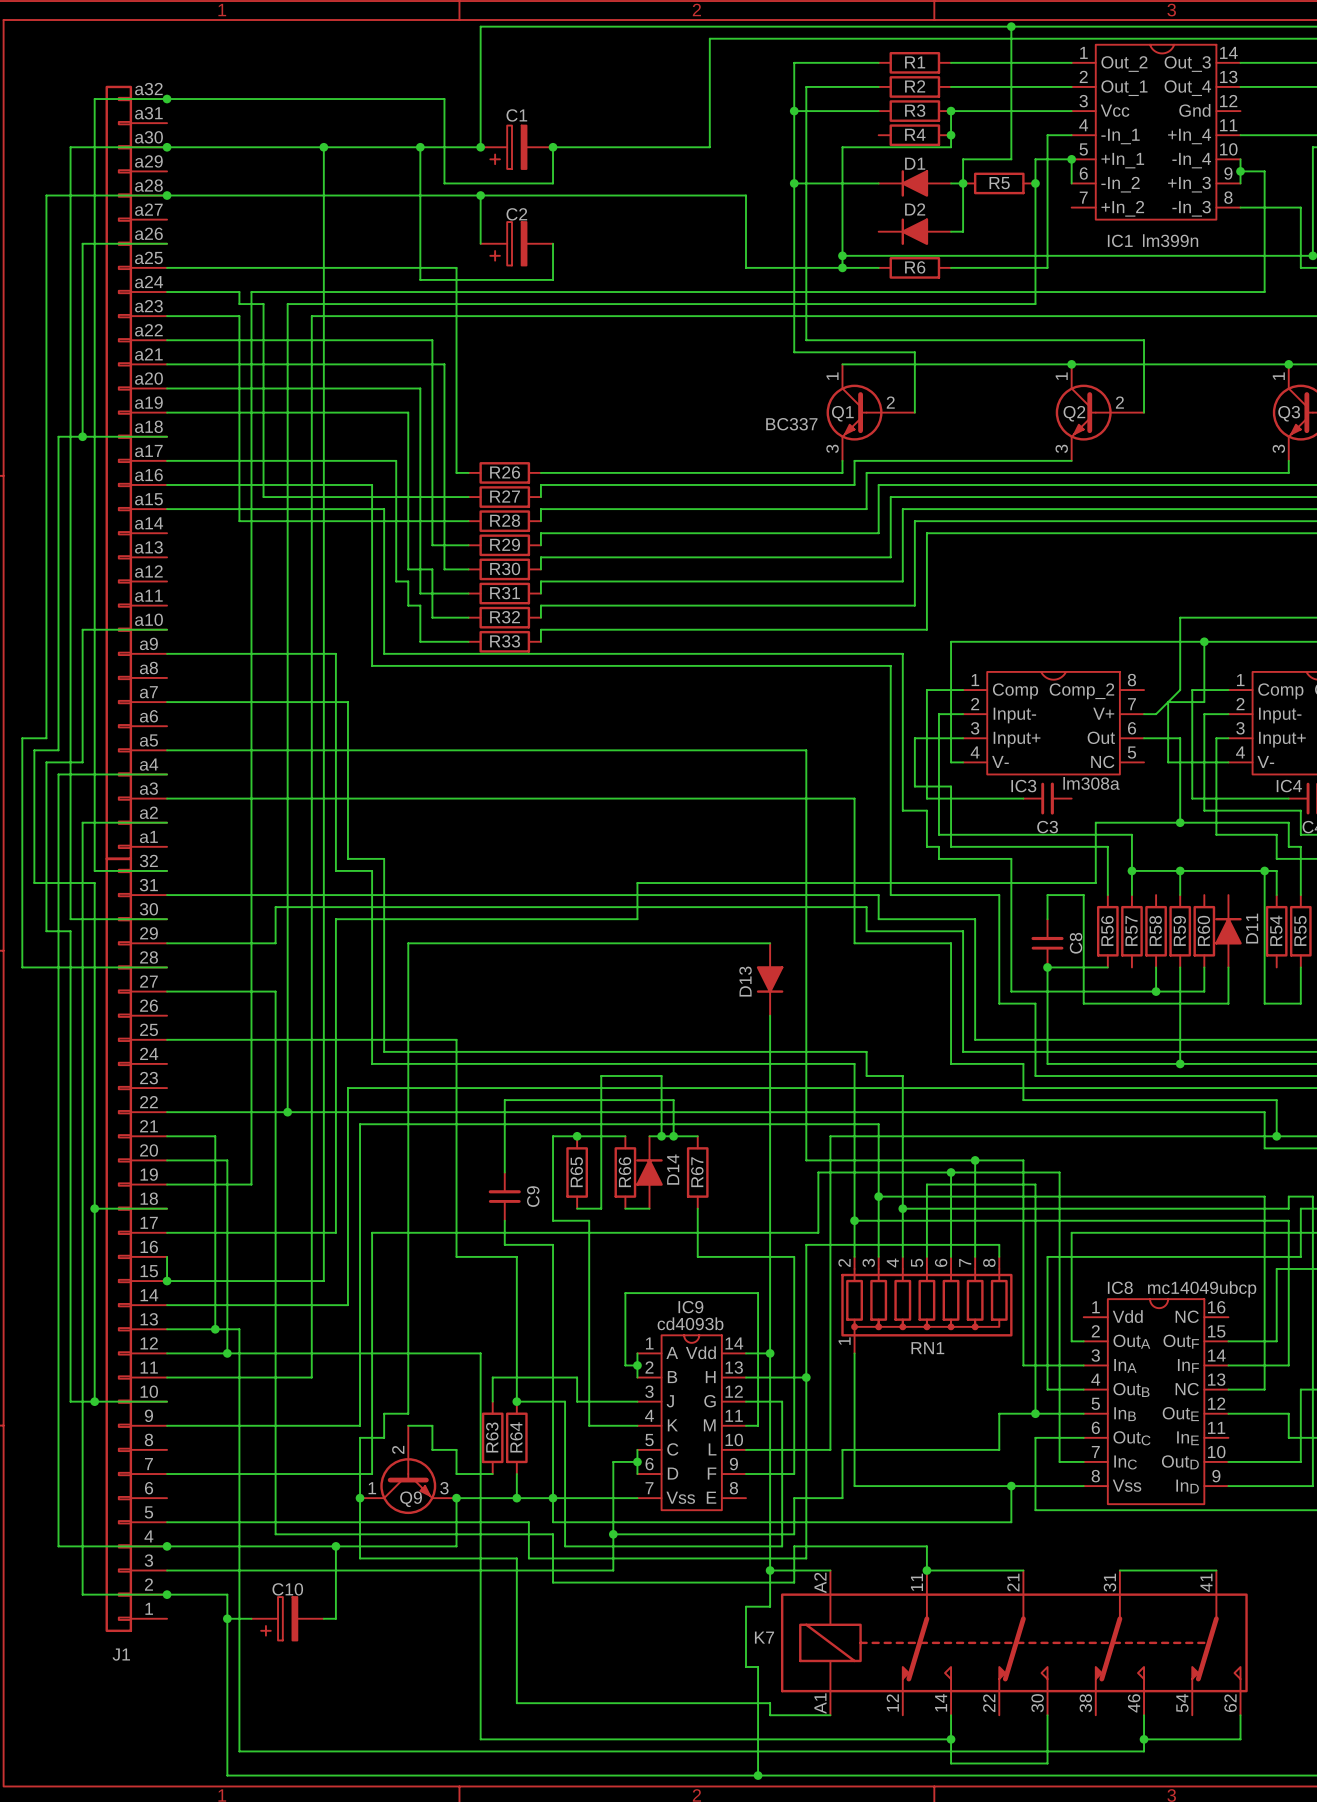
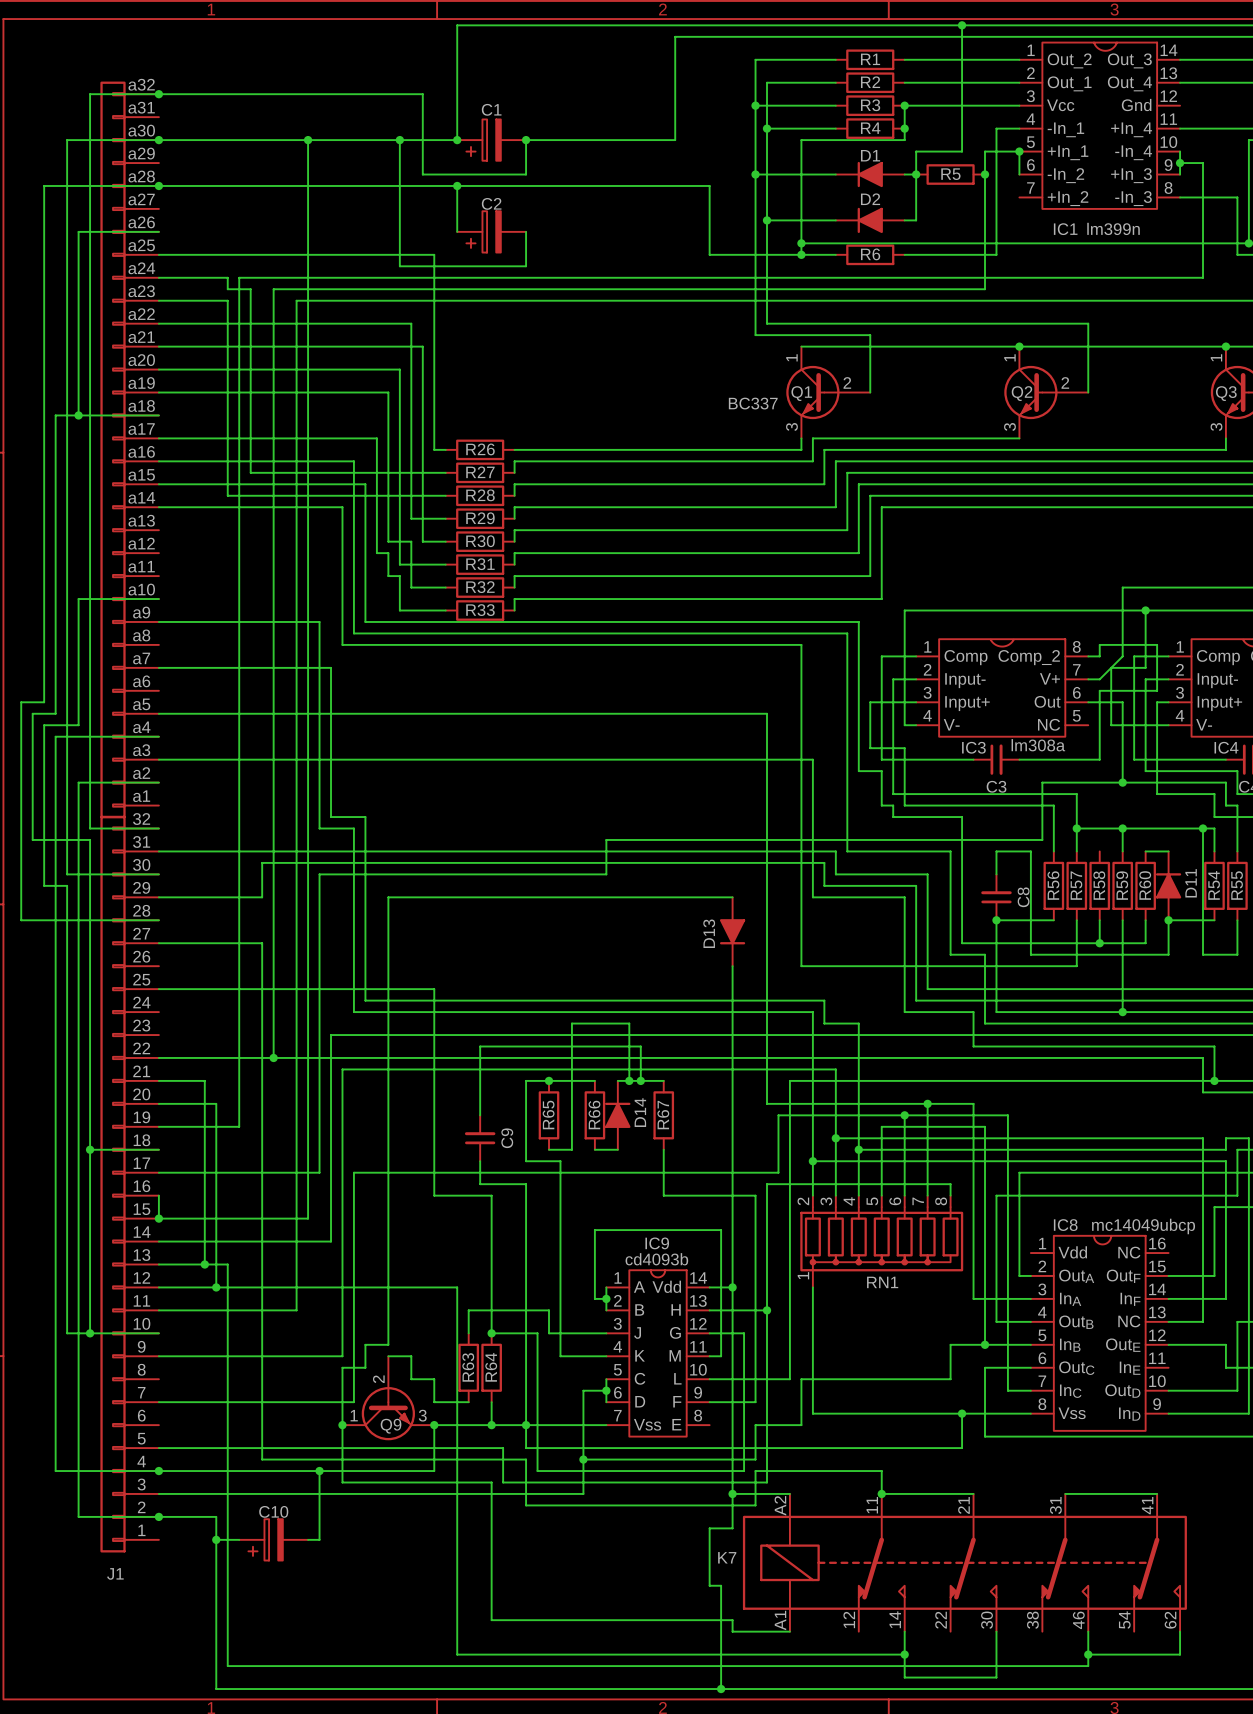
wire: none -> (767, 128) (835, 128)
junction: none -> (767, 128)
wire: none -> (767, 220) (835, 220)
junction: none -> (767, 220)
wire: none -> (158, 507) (342, 507) (342, 644) (801, 644) (801, 966) (1076, 966) (1076, 920)
wire: none -> (1088, 656) (1099, 656) (1099, 644) (1157, 644) (1157, 690) (1099, 690) (1099, 759) (1019, 759)
wire: none -> (1145, 851) (1168, 851)
wire: none -> (1168, 920) (1214, 920)
junction: none -> (1168, 920)

